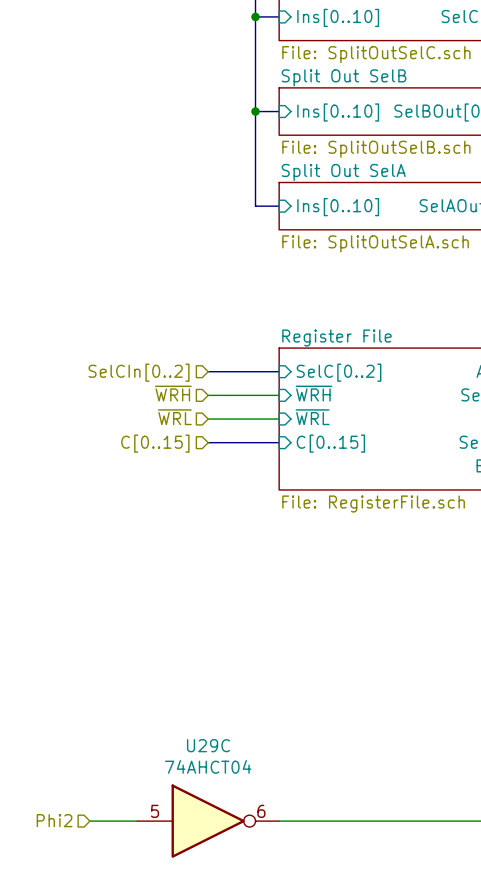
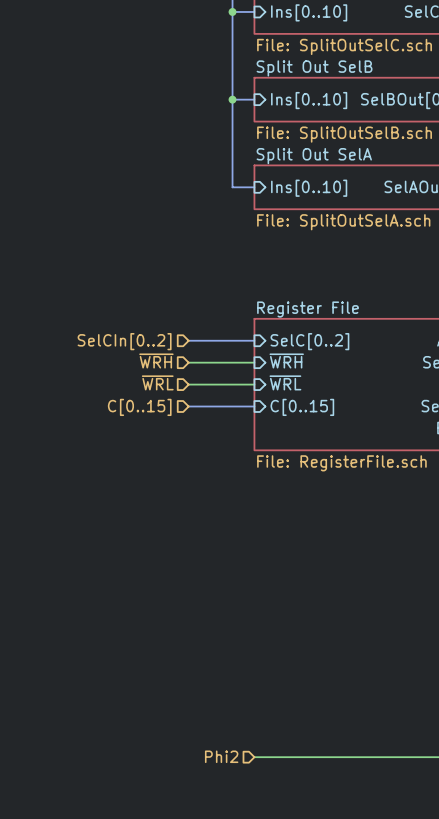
hierarchical label position: Phi2 (54, 820) -> Phi2 (221, 756)
wire: (89, 821) (137, 821) -> none
U29C: 74AHCT04 (208, 821) -> none

